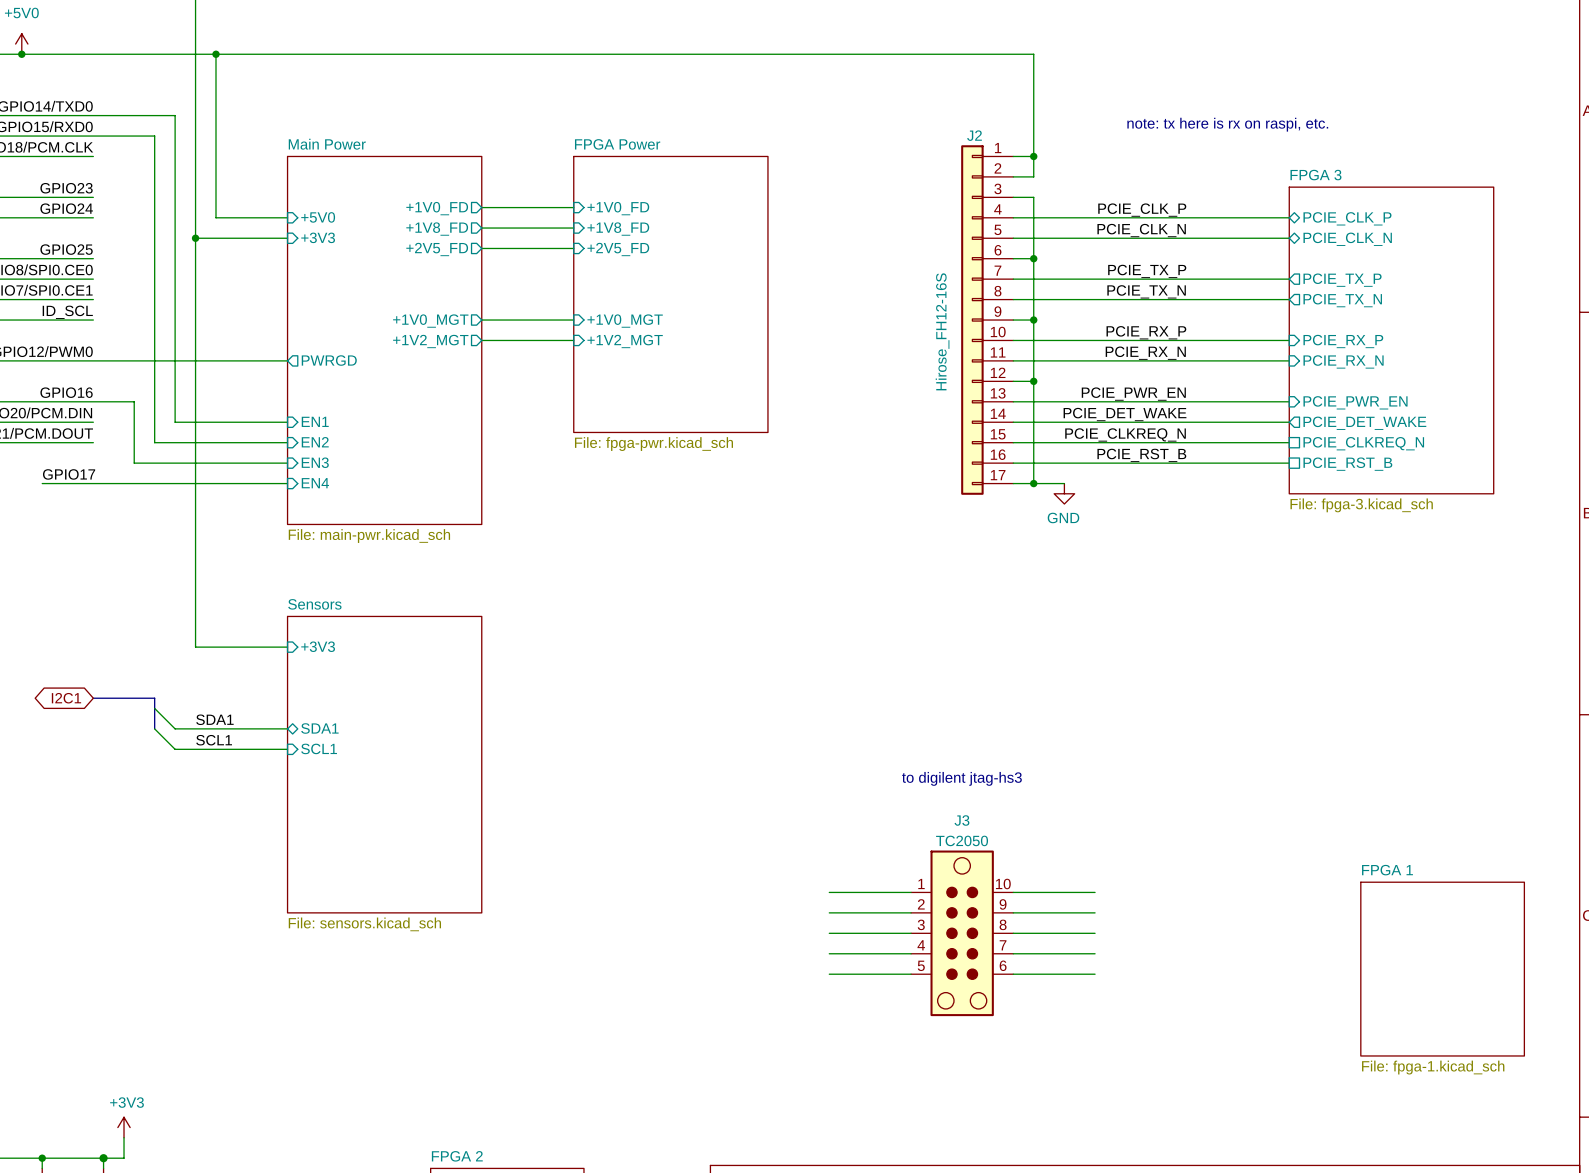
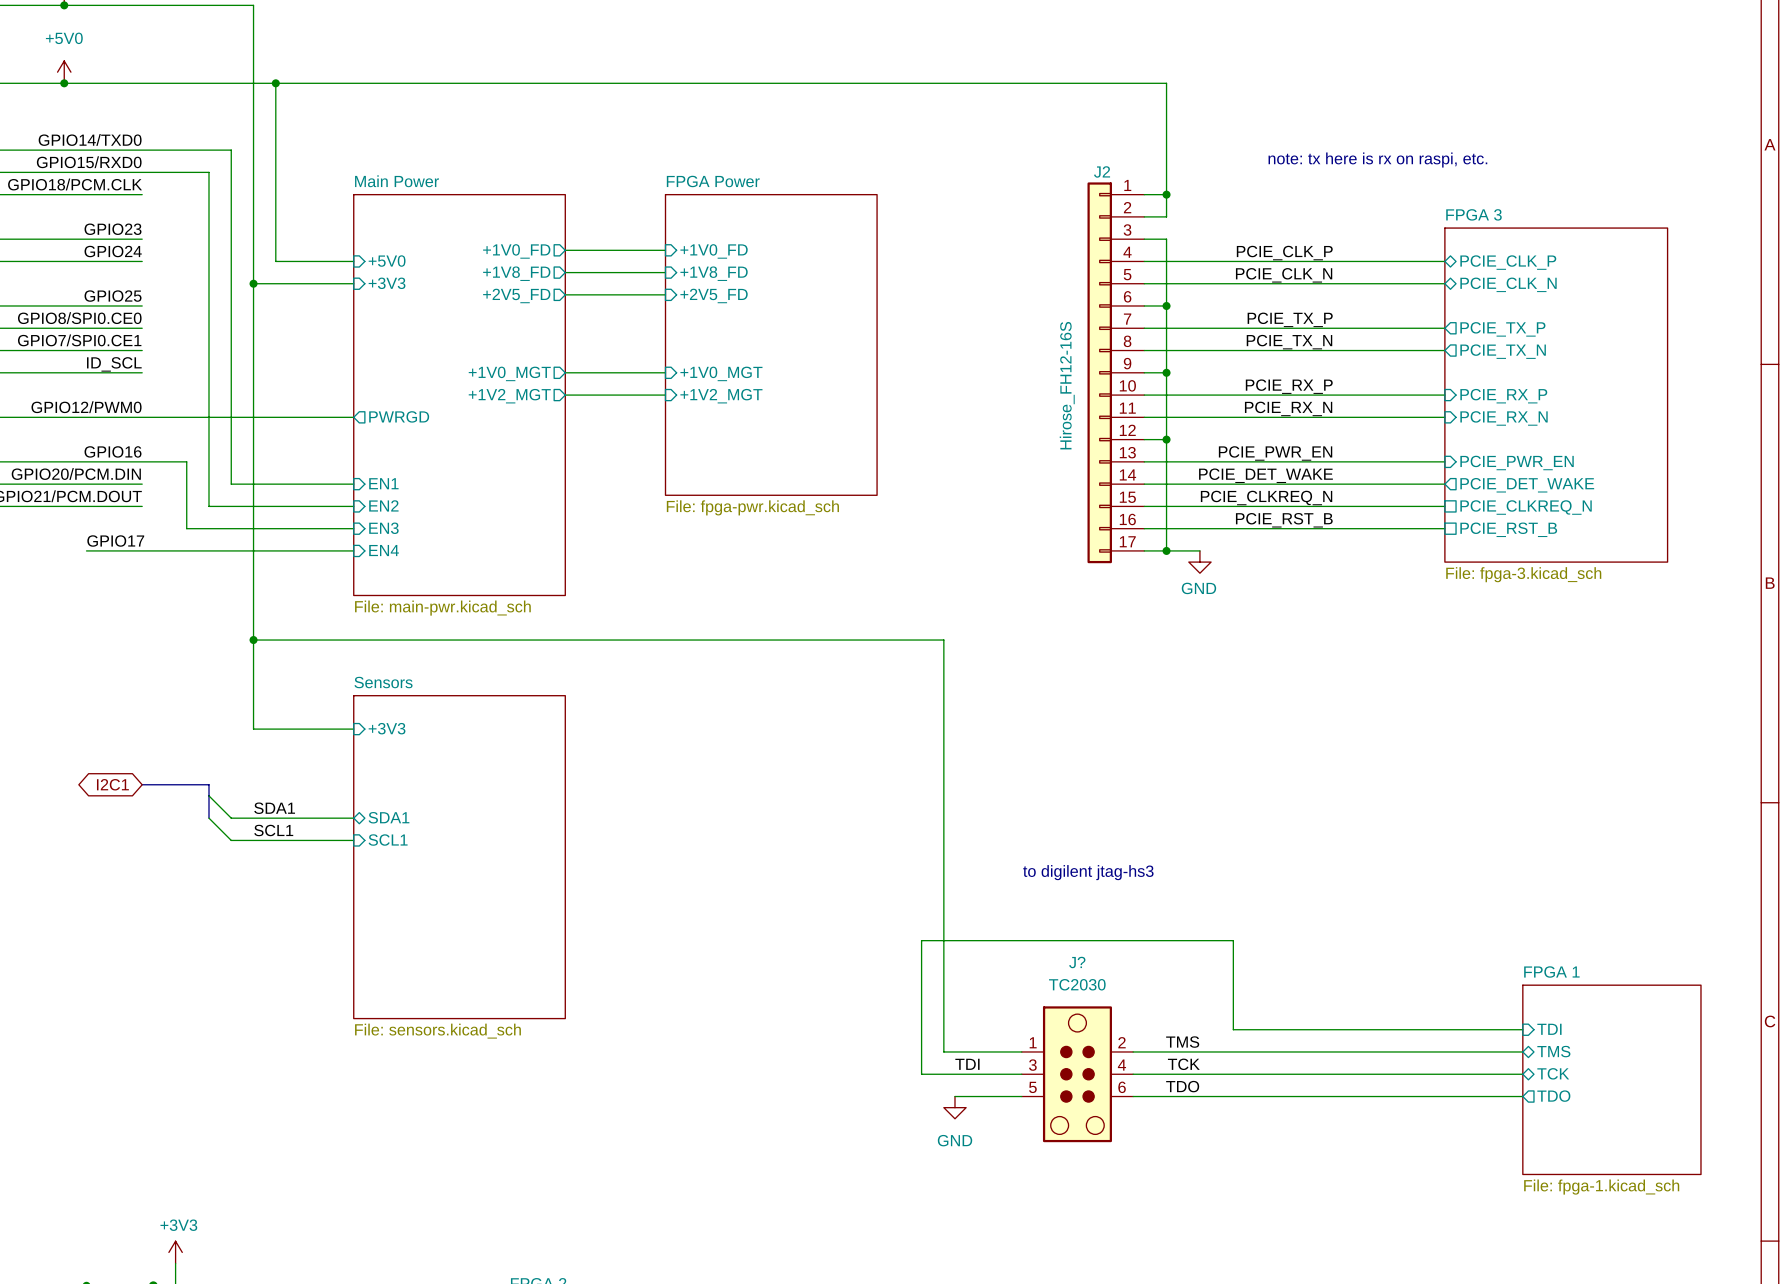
wire: none -> (253, 640) (943, 640) (943, 1051) (1021, 1051)
junction: none -> (253, 640)
wire: (829, 892) (911, 892) -> none
wire: (1013, 892) (1095, 892) -> none
wire: (829, 912) (911, 912) -> none
wire: (1013, 912) (1095, 912) -> none
sheet pin: none -> TDI (1549, 1029)
wire: none -> (1522, 1029) (1233, 1029) (1233, 940) (921, 940) (921, 1074) (1021, 1074)
wire: (829, 933) (911, 933) -> none
J3: TC2050 (962, 933) -> none
wire: (1013, 933) (1095, 933) -> none
label: none -> TMS (1182, 1042)
wire: none -> (1133, 1051) (1522, 1051)
sheet pin: none -> TMS (1553, 1051)
wire: (829, 953) (911, 953) -> none
wire: (1013, 953) (1095, 953) -> none
label: none -> TDI (967, 1064)
label: none -> TCK (1183, 1064)
J?: none -> TC2030 (1077, 1074)
wire: none -> (1133, 1074) (1522, 1074)
sheet pin: none -> TCK (1553, 1073)
wire: (829, 974) (911, 974) -> none
wire: (1013, 974) (1095, 974) -> none
label: none -> TDO (1182, 1086)
wire: none -> (954, 1096) (1021, 1096)
wire: none -> (1133, 1096) (1522, 1096)
sheet pin: none -> TDO (1553, 1096)
power symbol: none -> GND (954, 1107)

